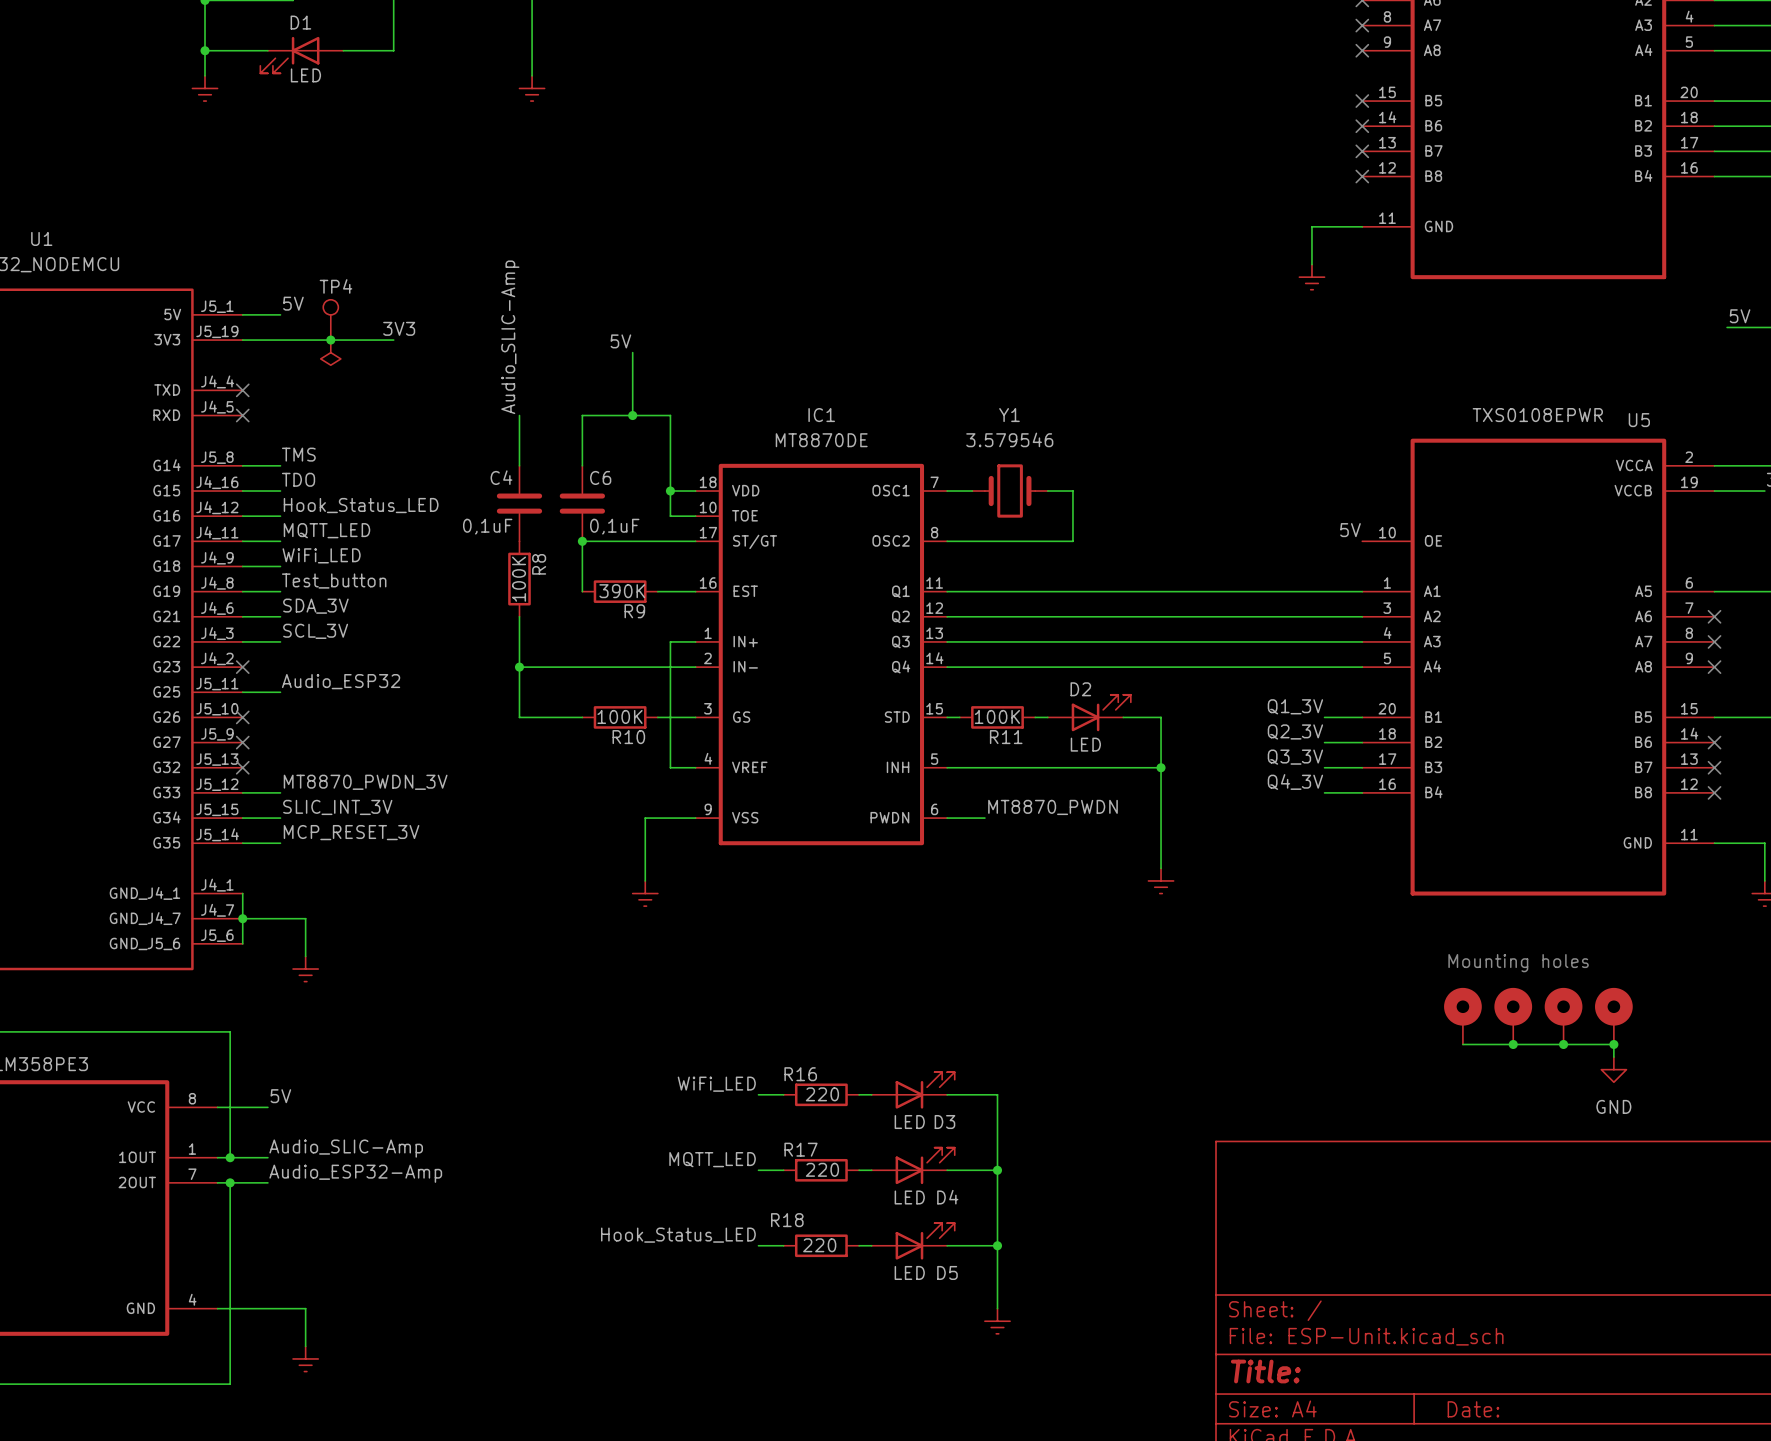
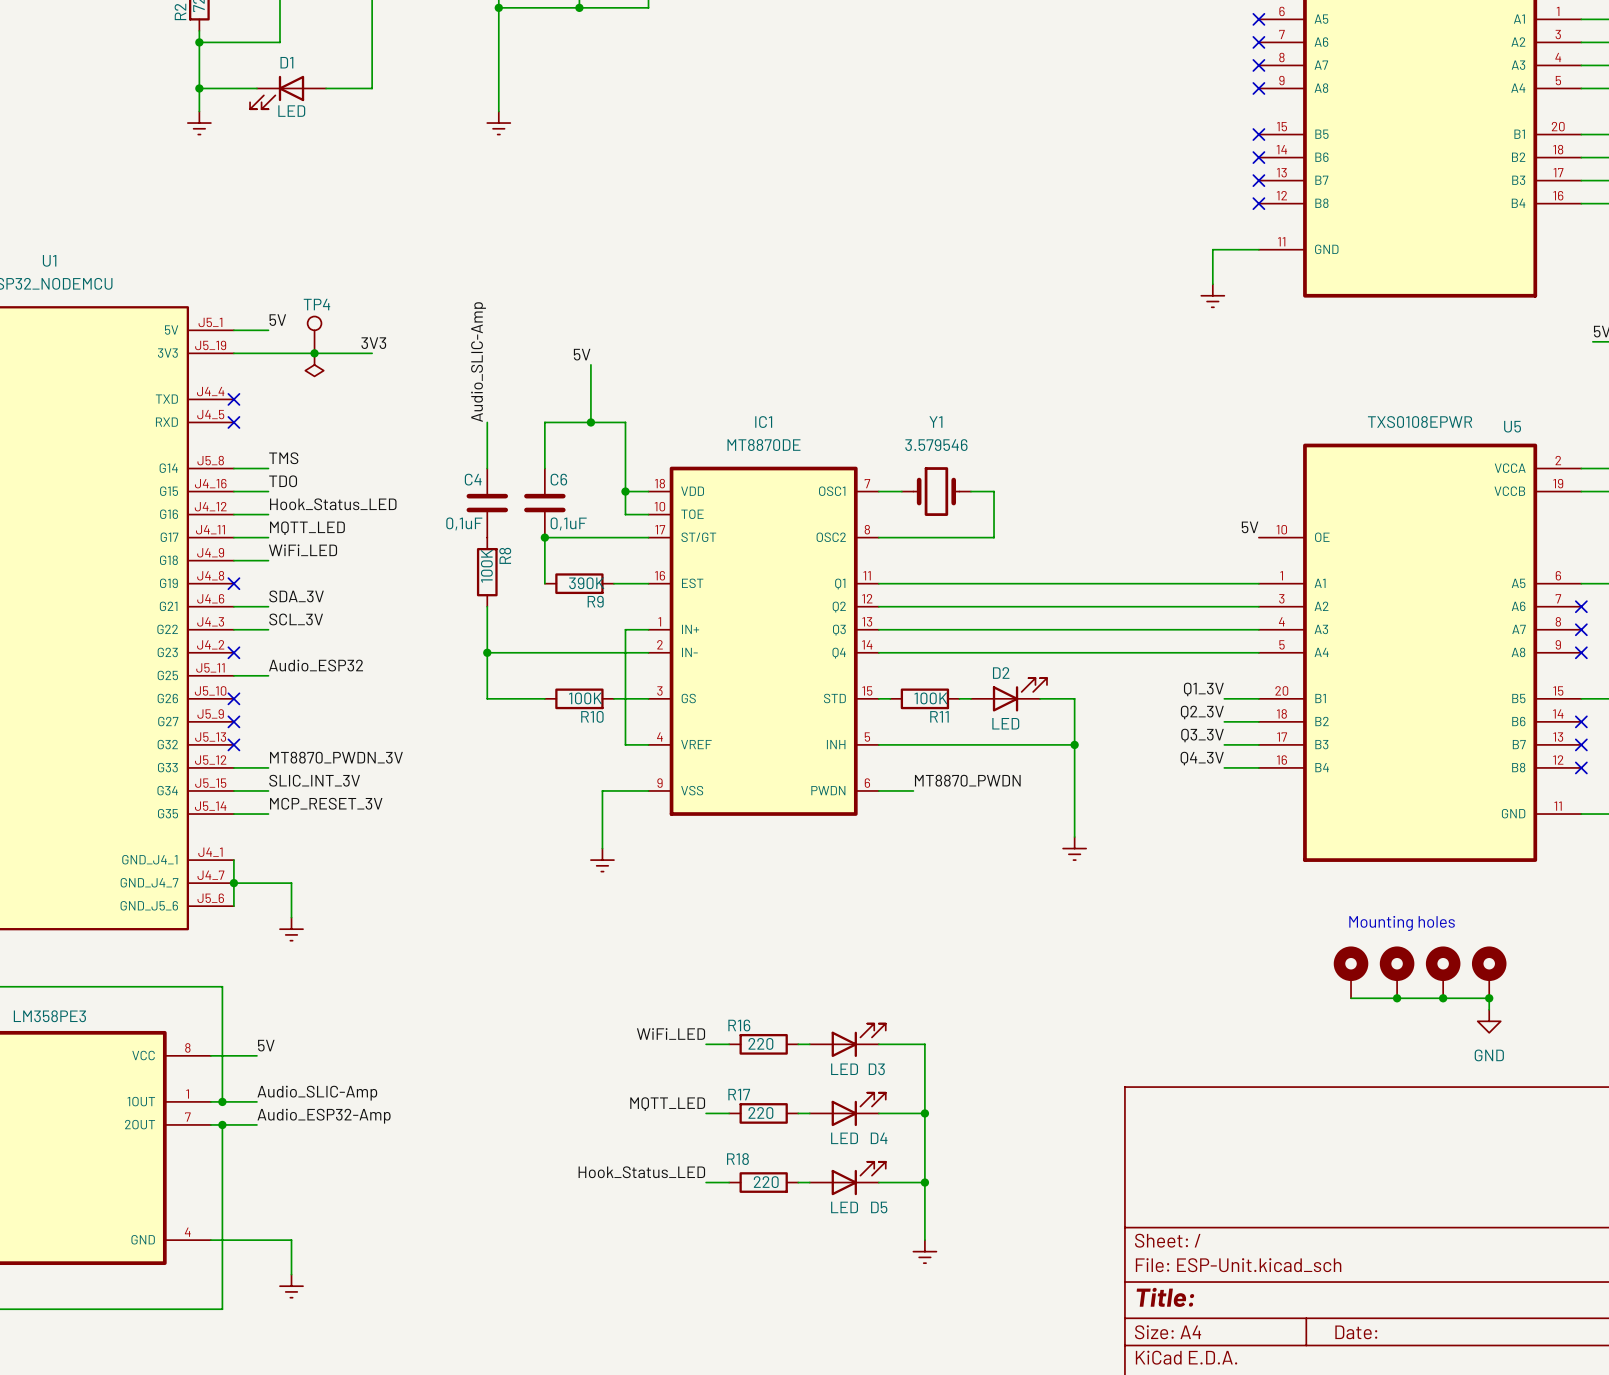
label: Test_button (334, 581) -> none
wire: (242, 591) (280, 591) -> none
no-connect mark: none -> (233, 583)

